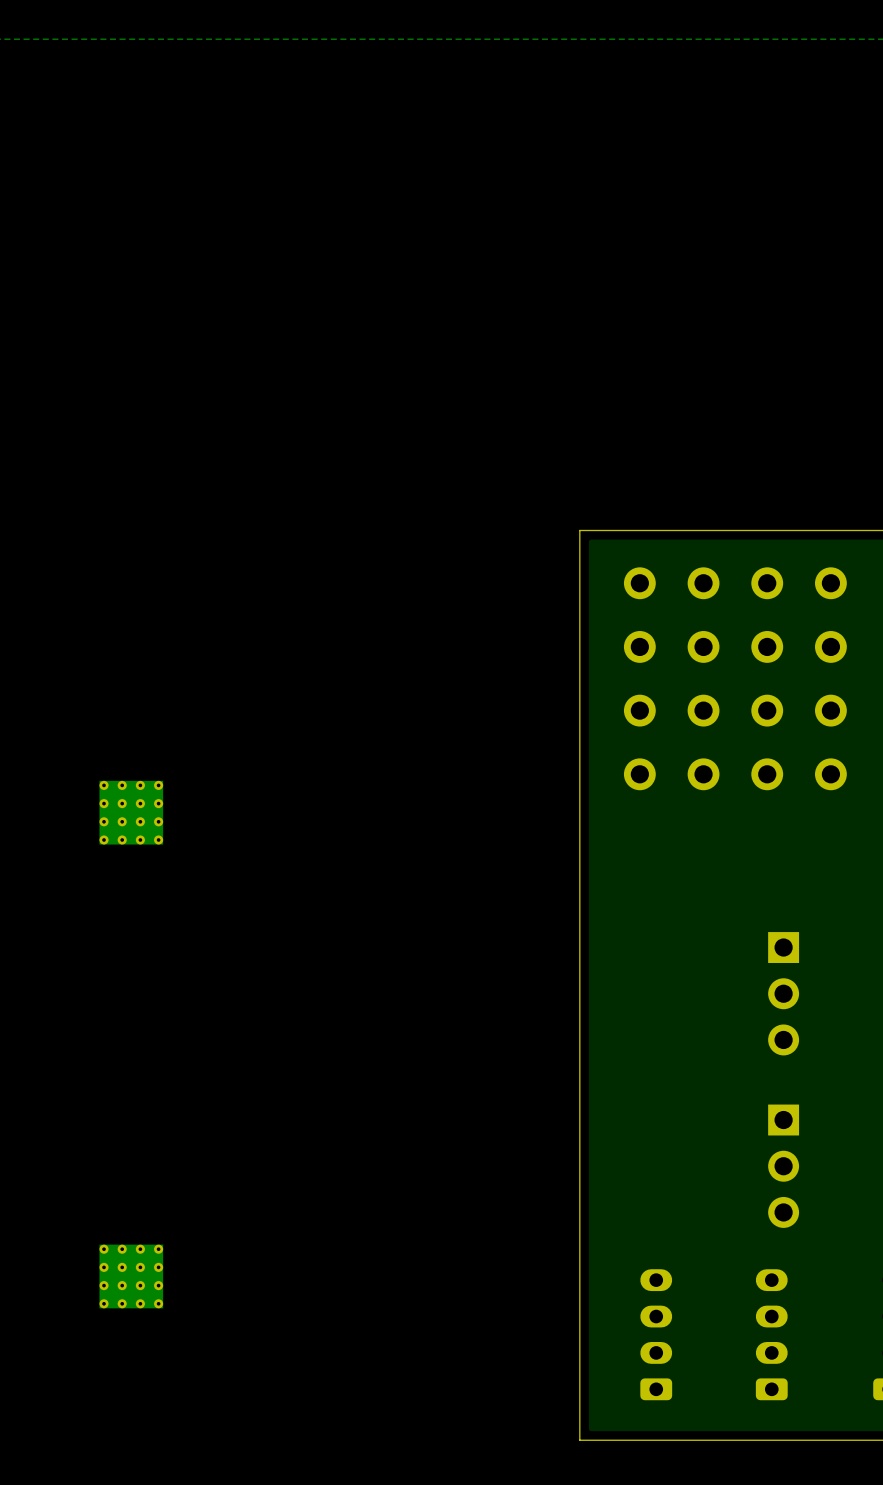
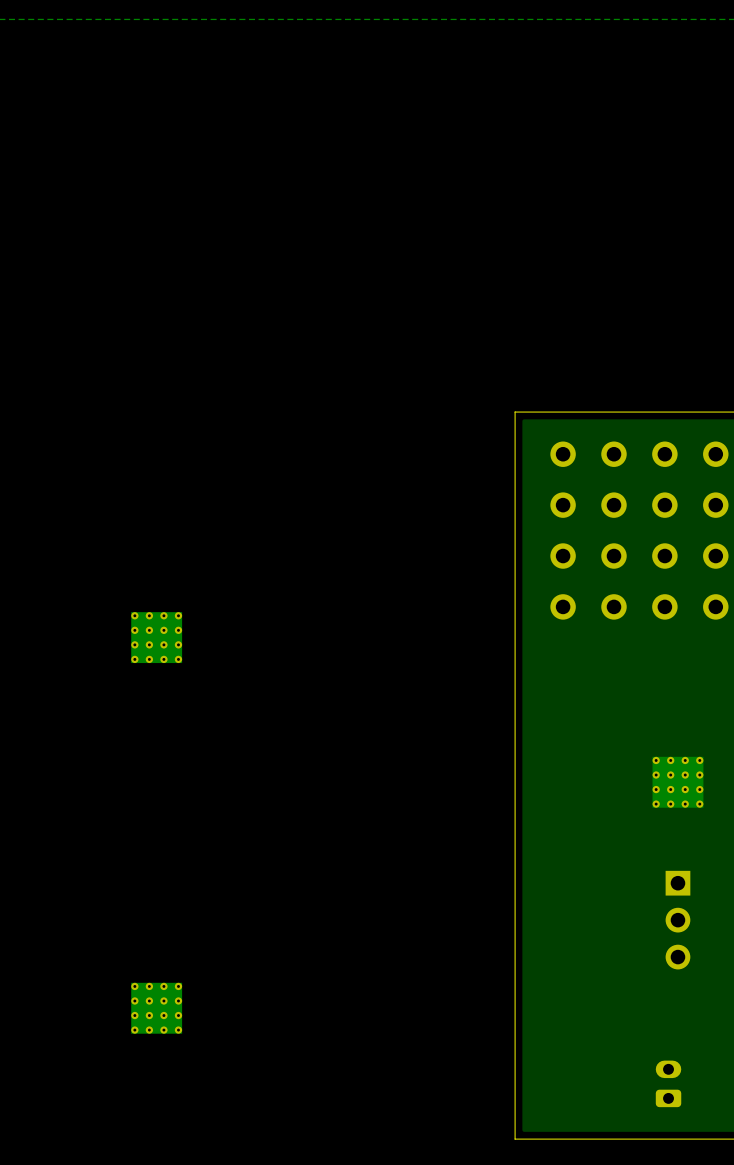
part footprint: [768, 932, 800, 1056] -> [652, 756, 704, 808]
part: (656, 1334) -> none
part: (771, 1334) -> none

